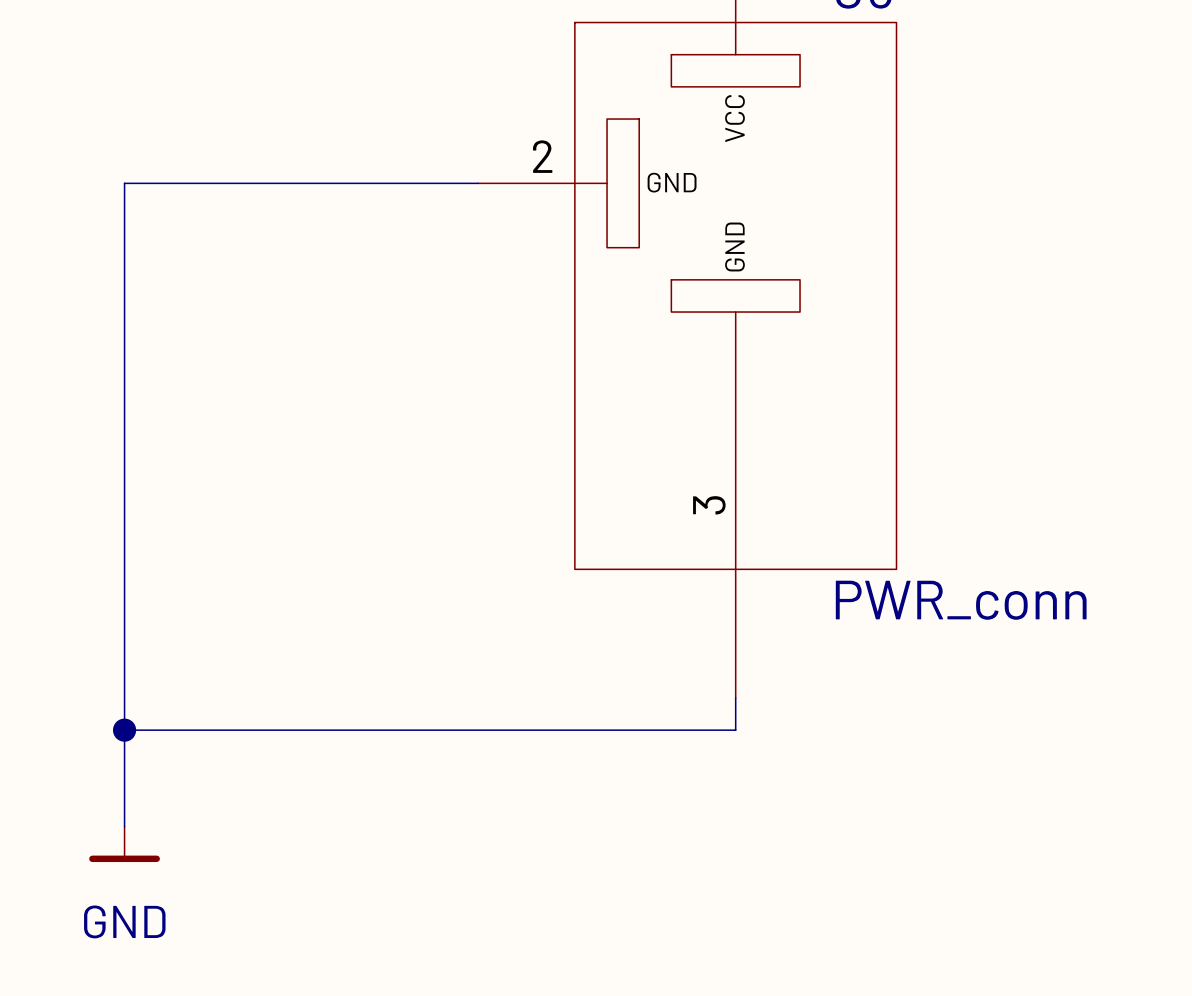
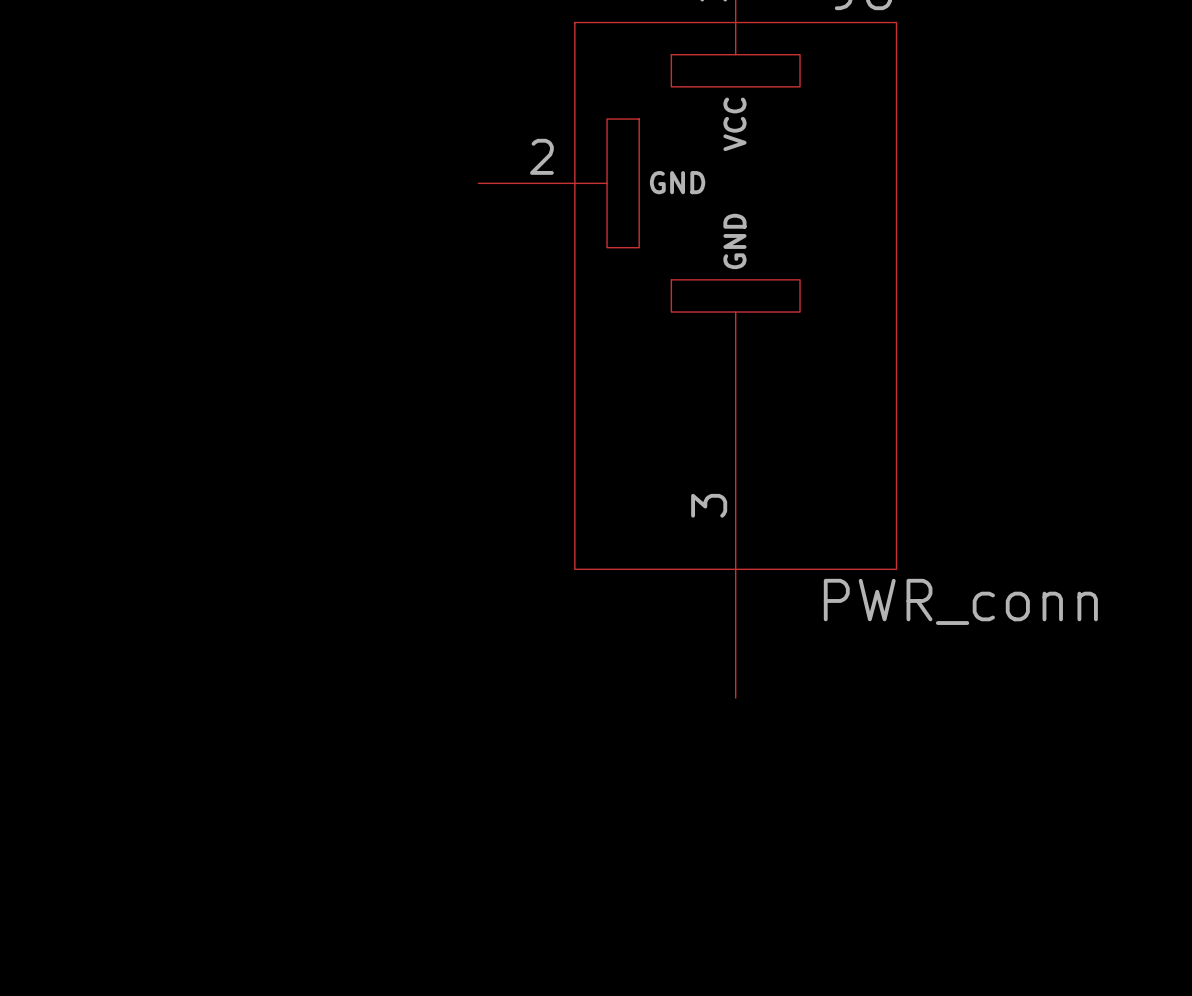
wire: (478, 183) (124, 183) (124, 826) -> none
wire: (735, 697) (735, 730) (124, 730) -> none
junction: (124, 730) -> none
power symbol: GND (124, 844) -> none

